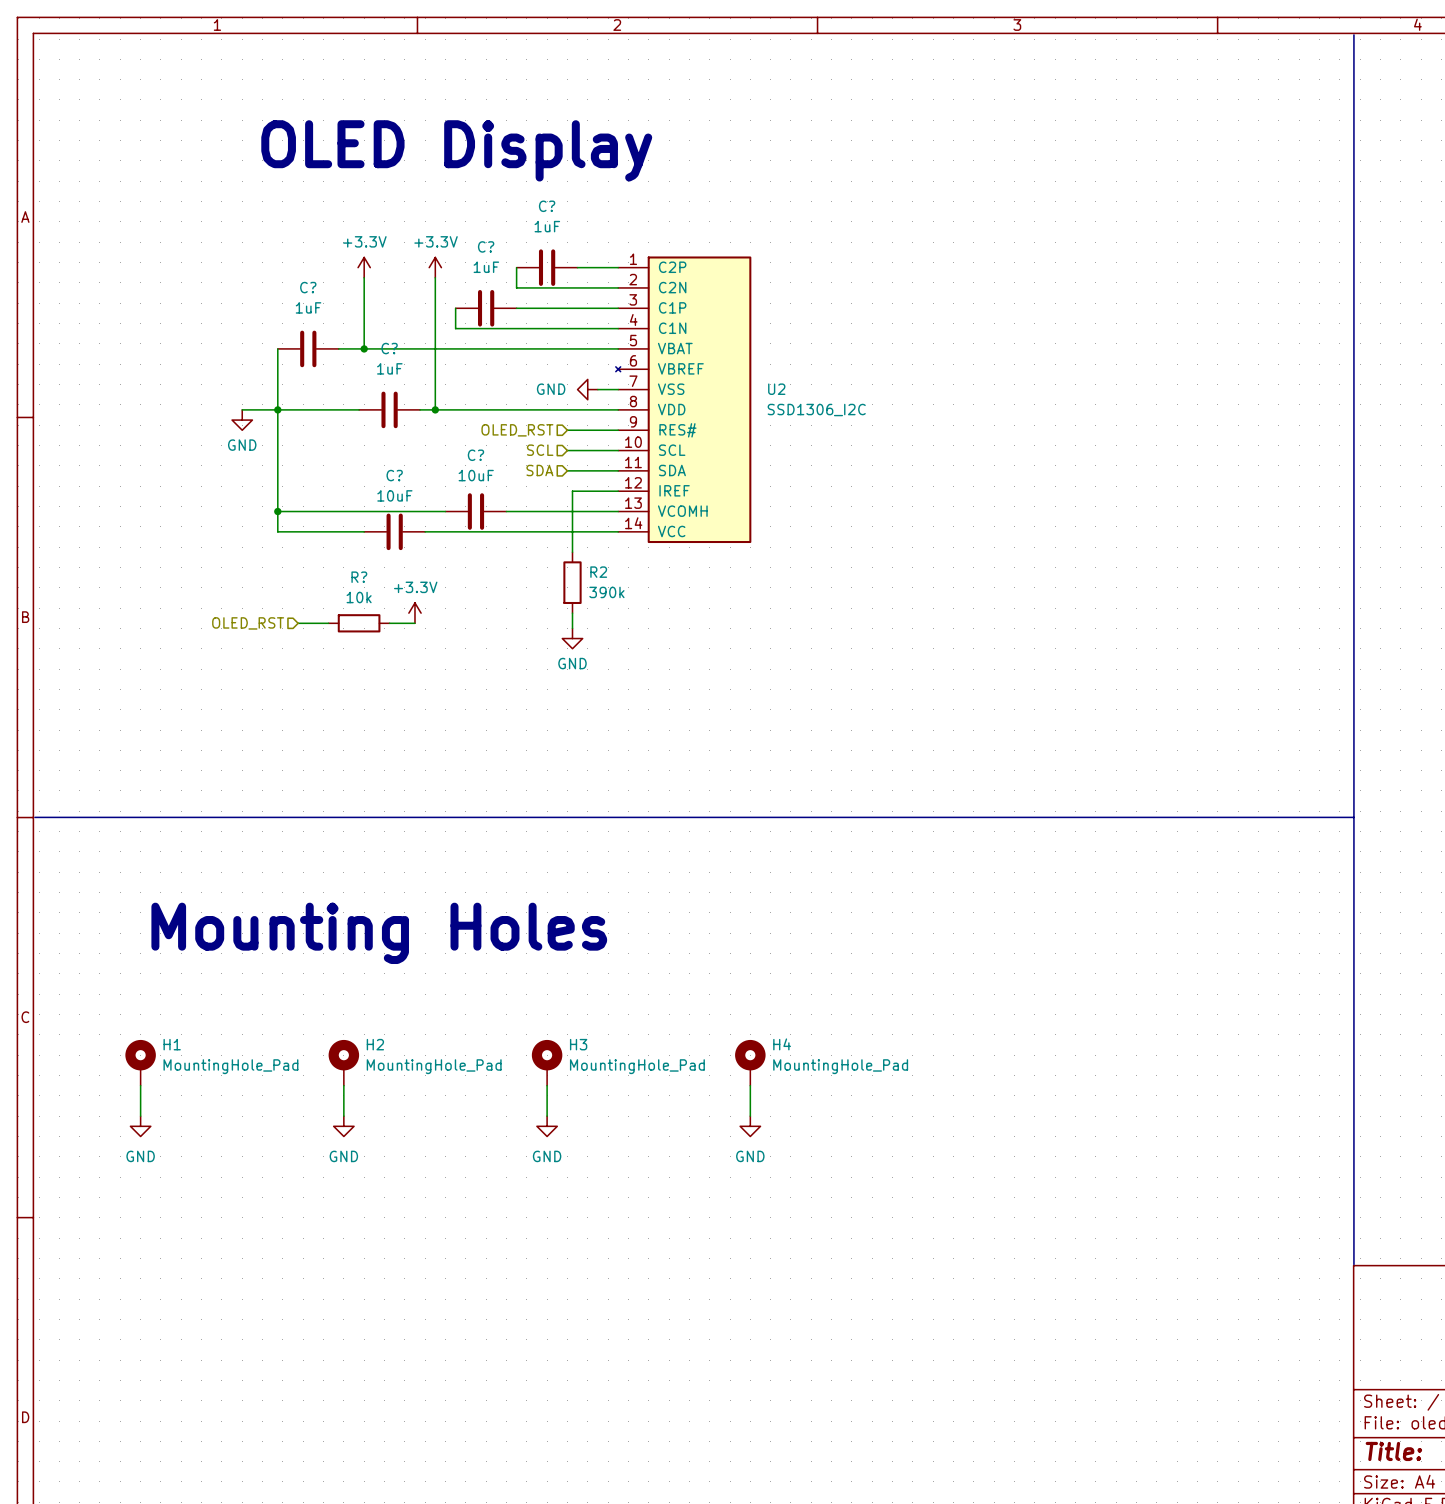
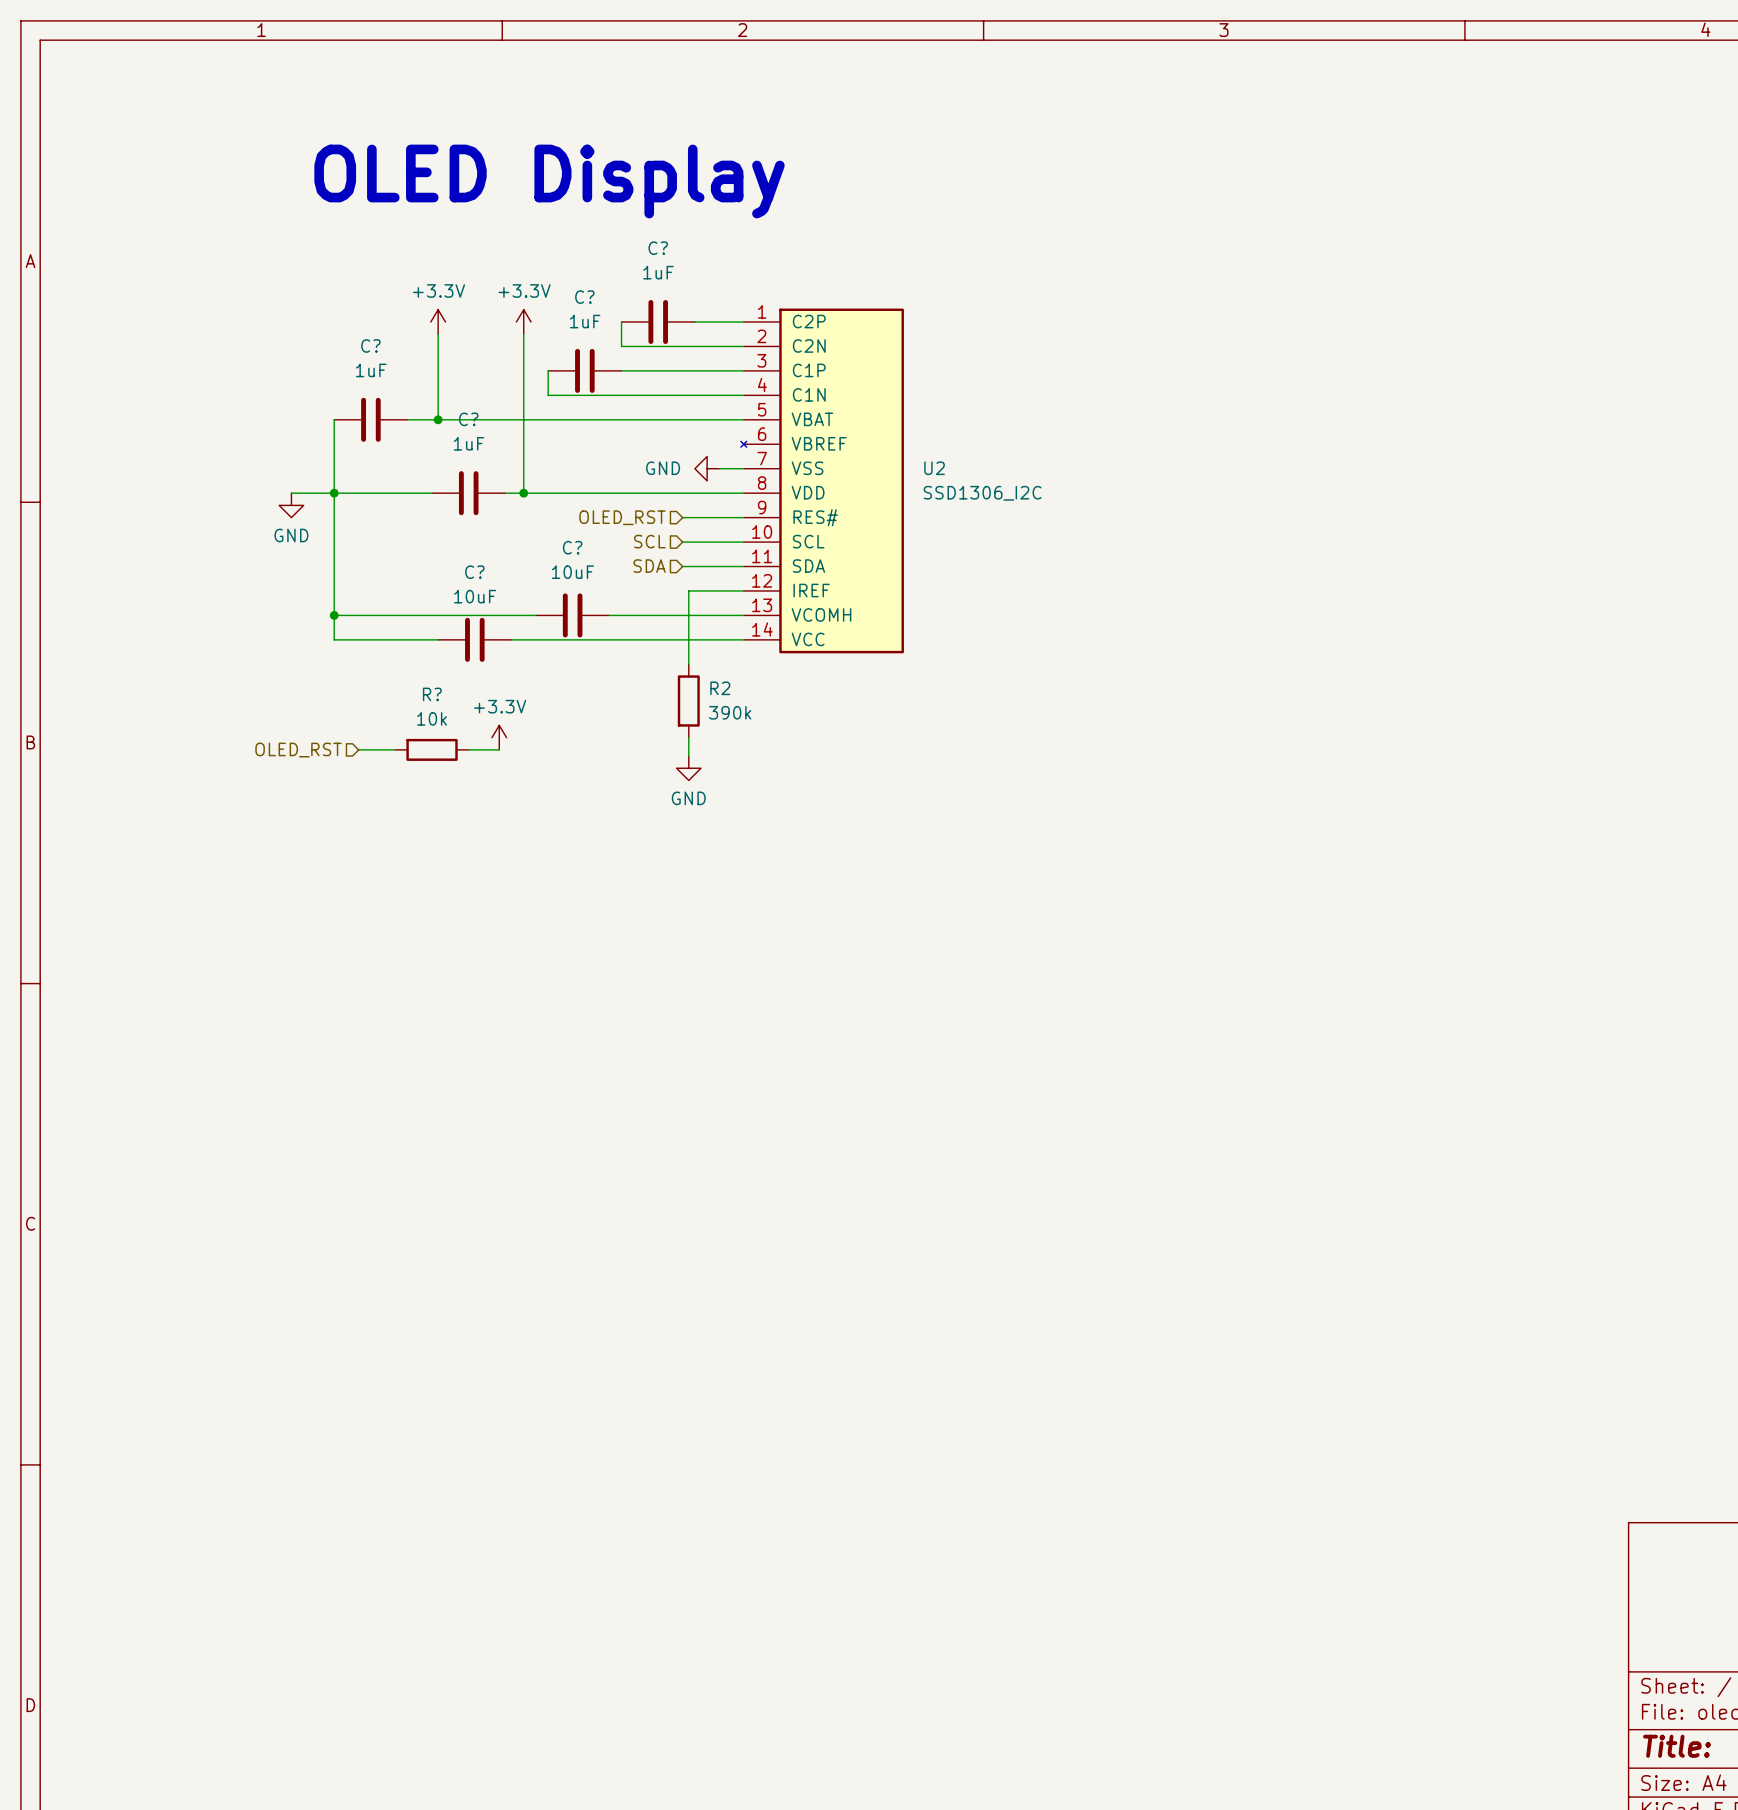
line: (1353, 34) (1353, 1264) -> none
line: (34, 817) (1353, 817) -> none
text: Mounting Holes (379, 933) -> none
H1: MountingHole_Pad (140, 1062) -> none
H2: MountingHole_Pad (343, 1062) -> none
H3: MountingHole_Pad (547, 1062) -> none
H4: MountingHole_Pad (750, 1062) -> none
wire: (140, 1085) (140, 1116) -> none
wire: (343, 1085) (343, 1116) -> none
wire: (547, 1085) (547, 1116) -> none
wire: (750, 1085) (750, 1116) -> none
power symbol: GND (140, 1126) -> none
power symbol: GND (343, 1126) -> none
power symbol: GND (547, 1126) -> none
power symbol: GND (750, 1126) -> none

